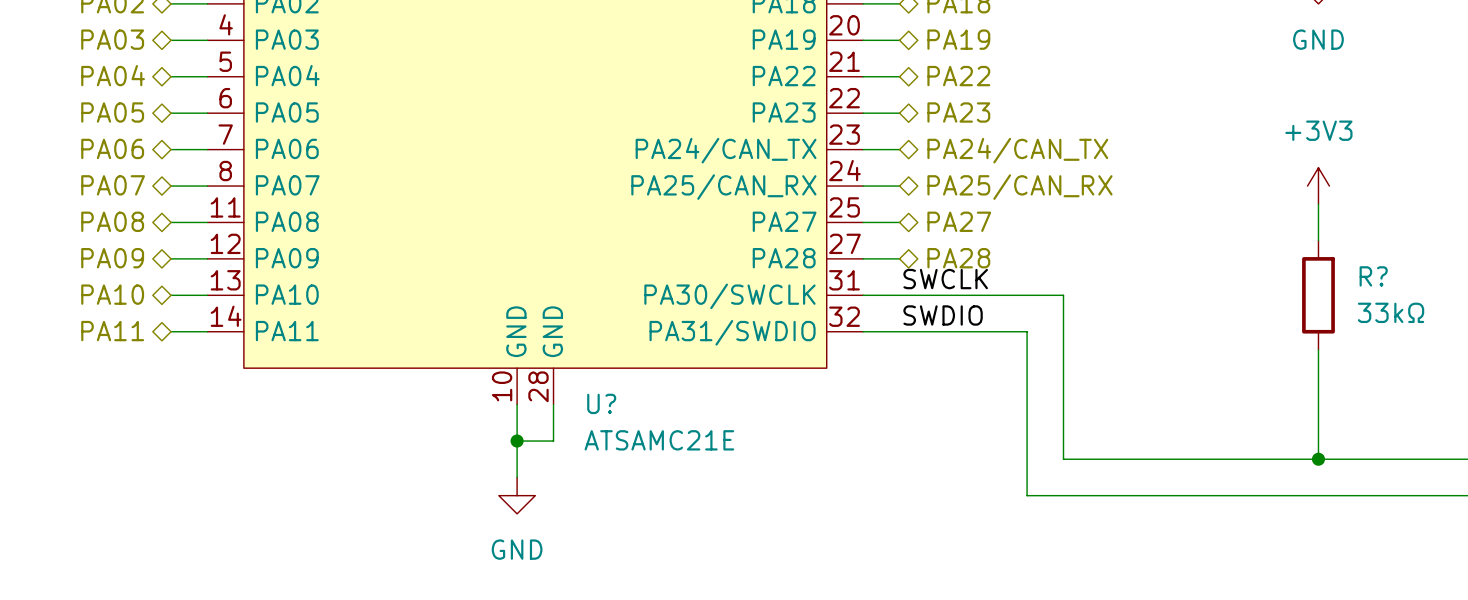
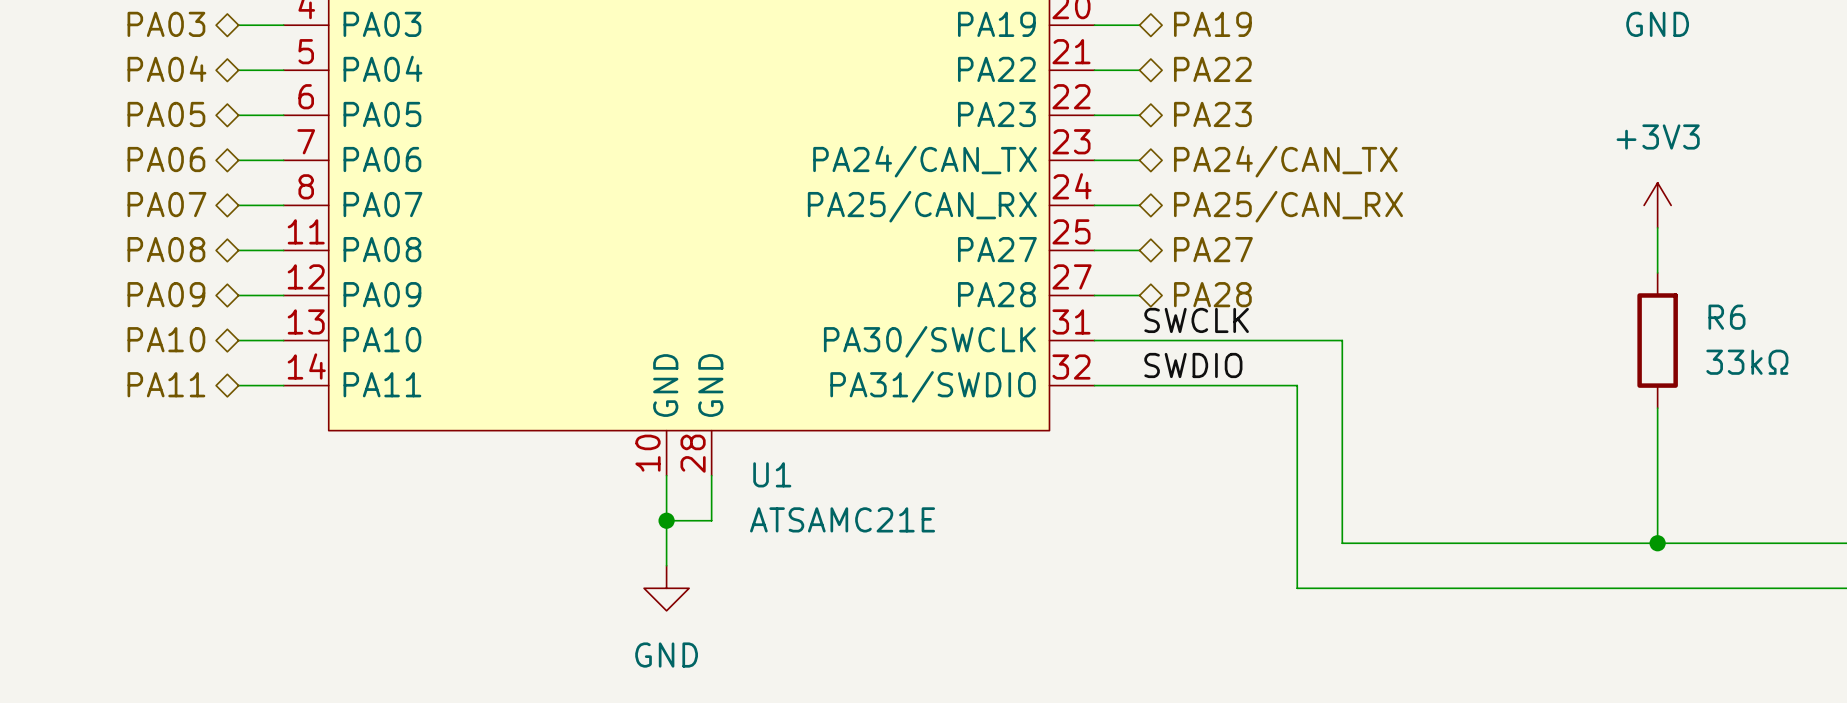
R? name: R? (1373, 276) -> R6 (1726, 317)
U? name: U? (601, 403) -> U1 (772, 474)

